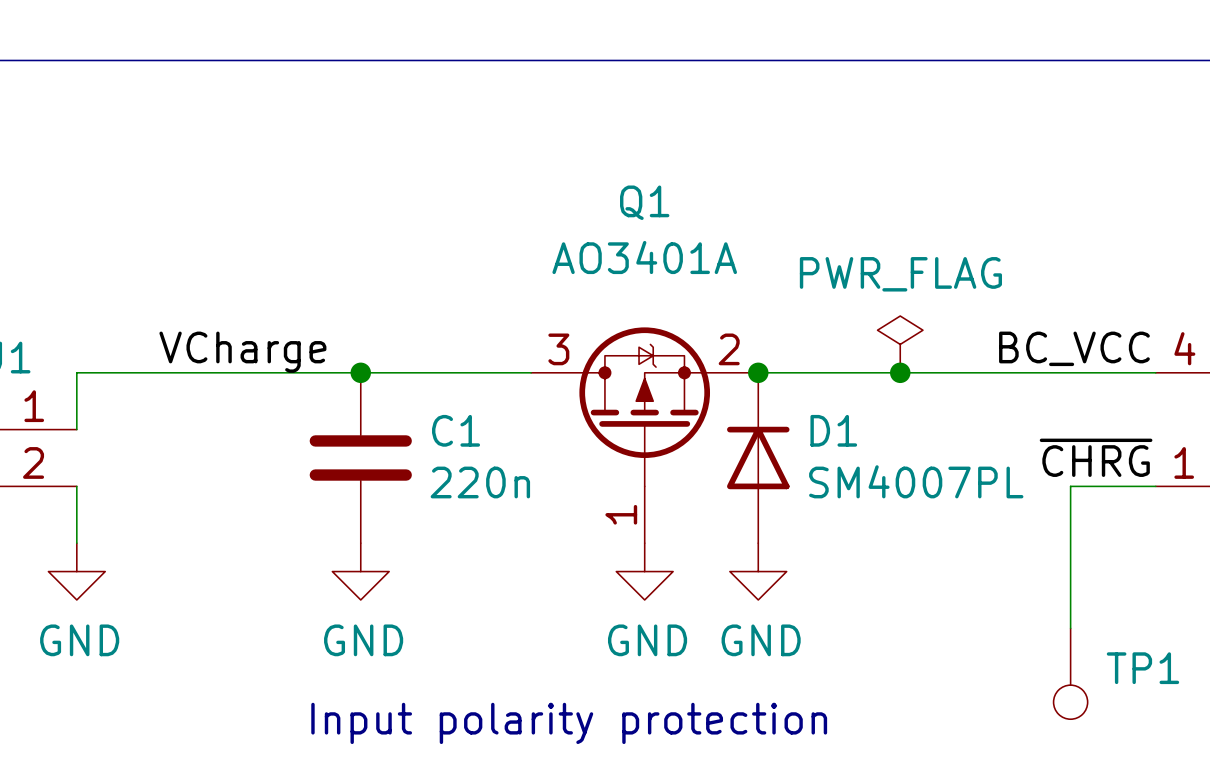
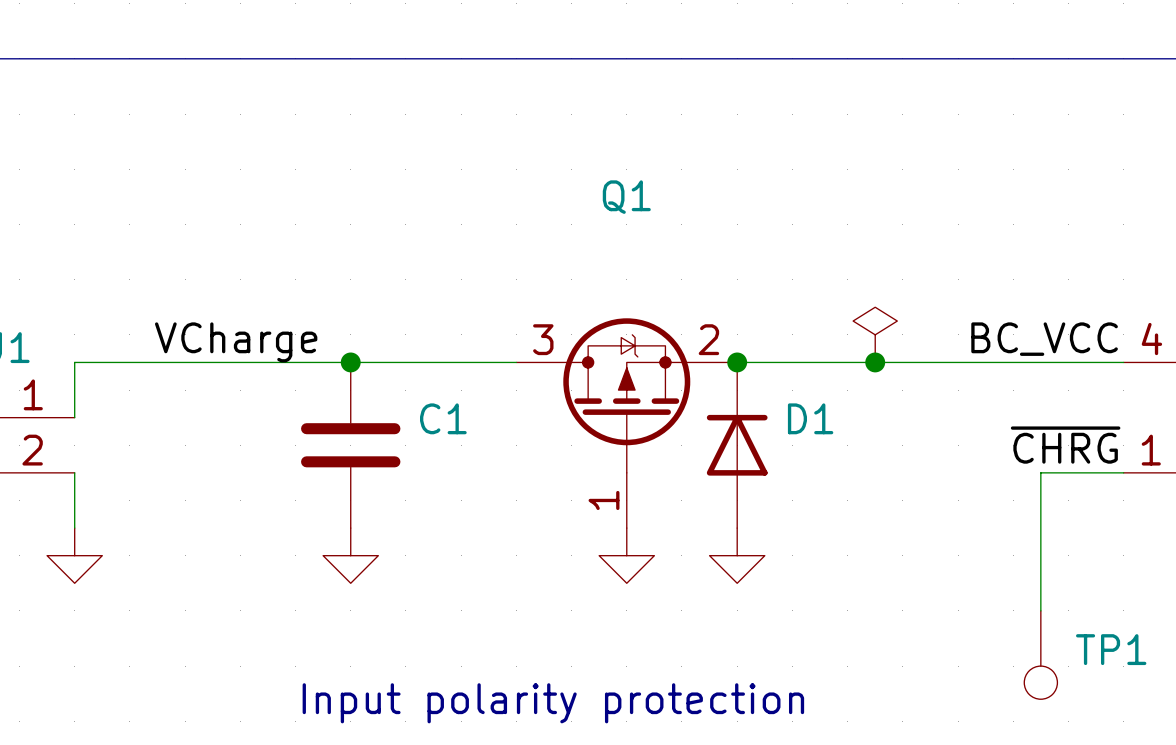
Q1 value: AO3401A (644, 257) -> none
power symbol text: PWR_FLAG (900, 274) -> none
D1 value: SM4007PL (916, 481) -> none
C1 value: 220n (480, 482) -> none
power symbol text: GND (79, 640) -> none
power symbol text: GND (363, 640) -> none
power symbol text: GND (647, 640) -> none
power symbol text: GND (761, 640) -> none

